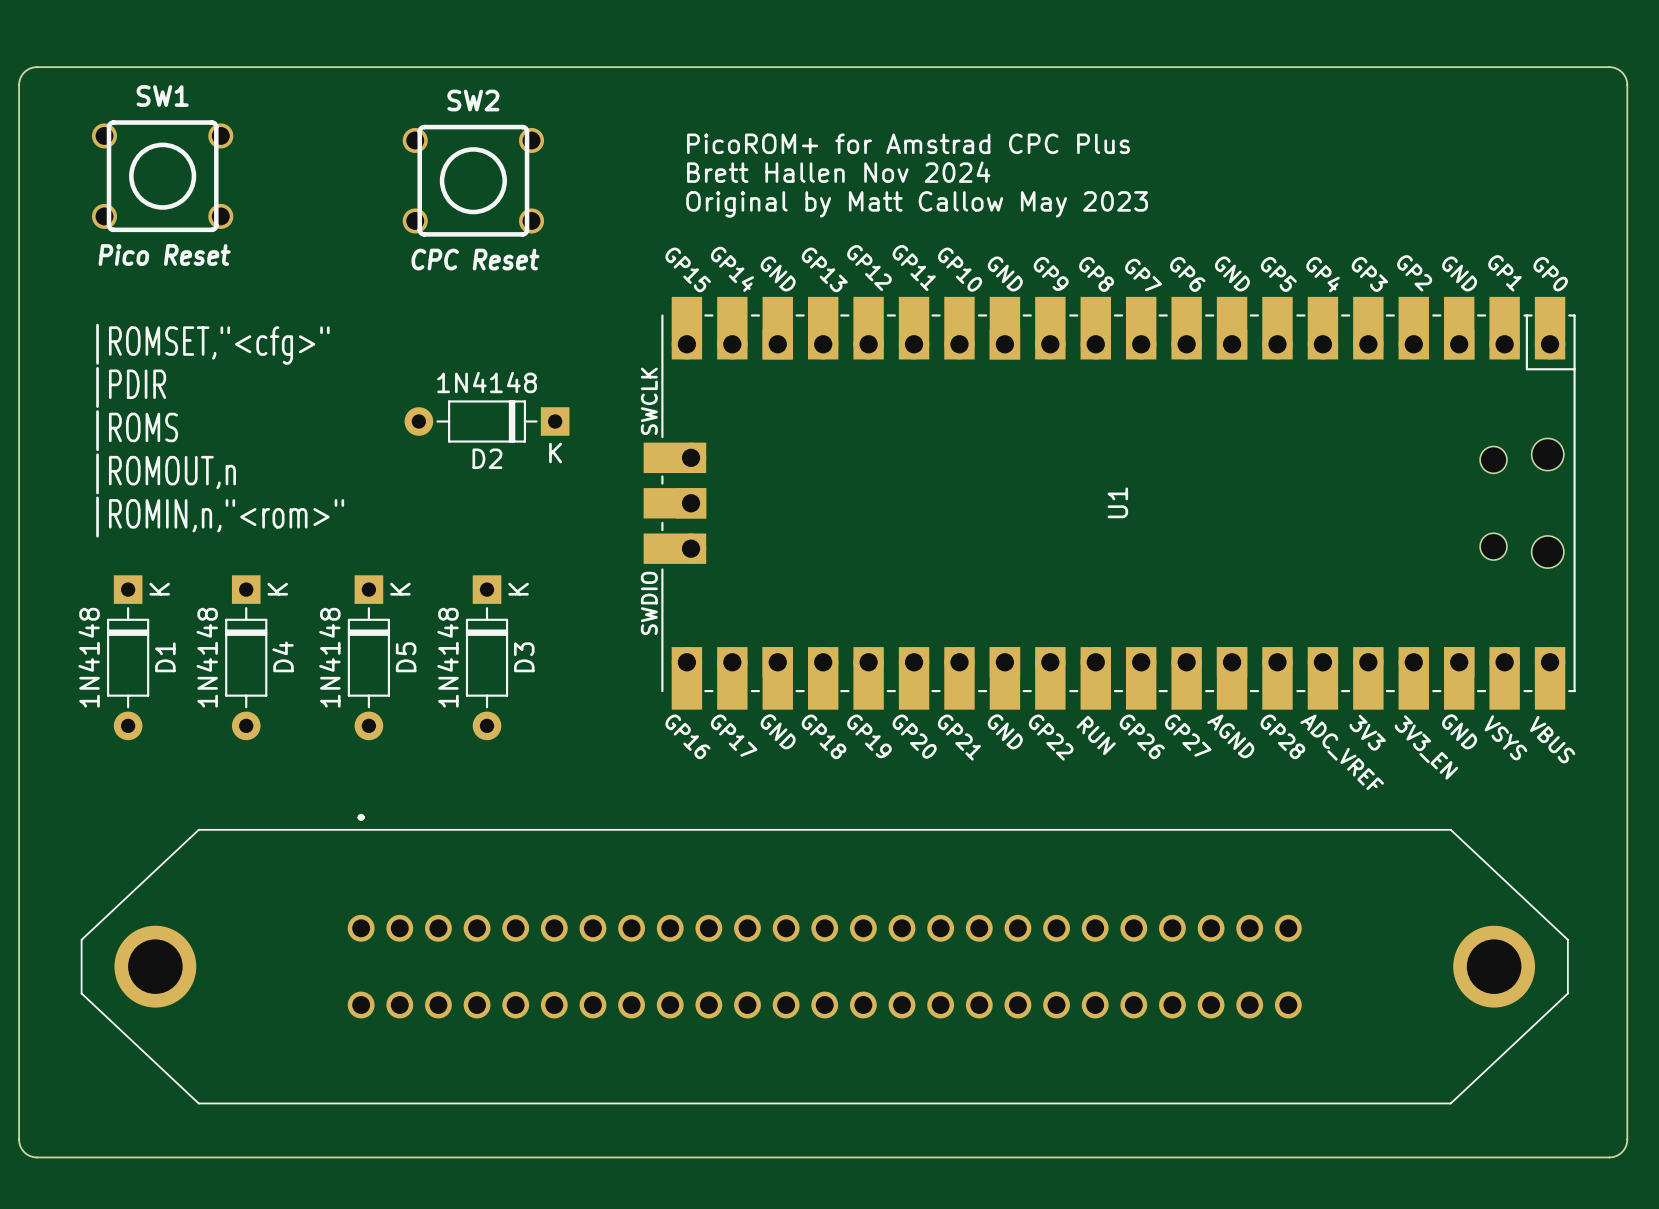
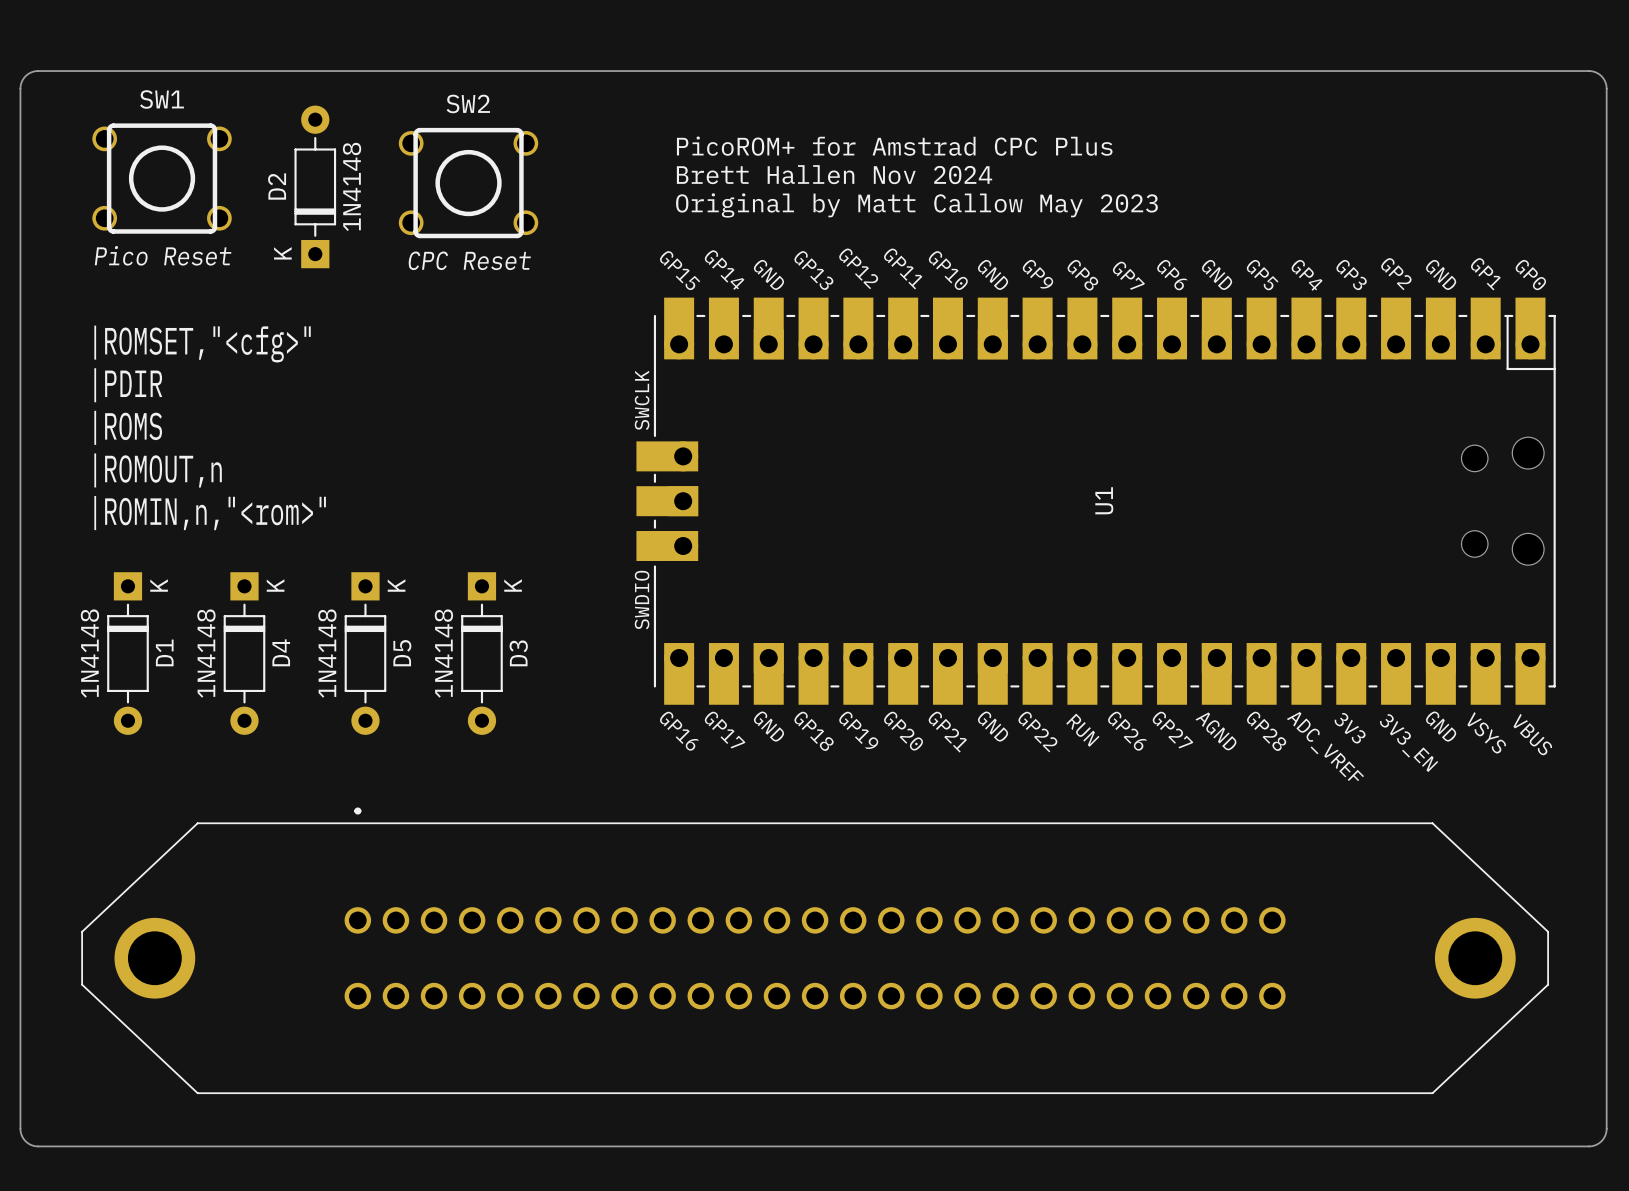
D2 rotation: 0° (487, 421) -> 90° clockwise (315, 186)
D2 position: (487, 421) -> (315, 186)

